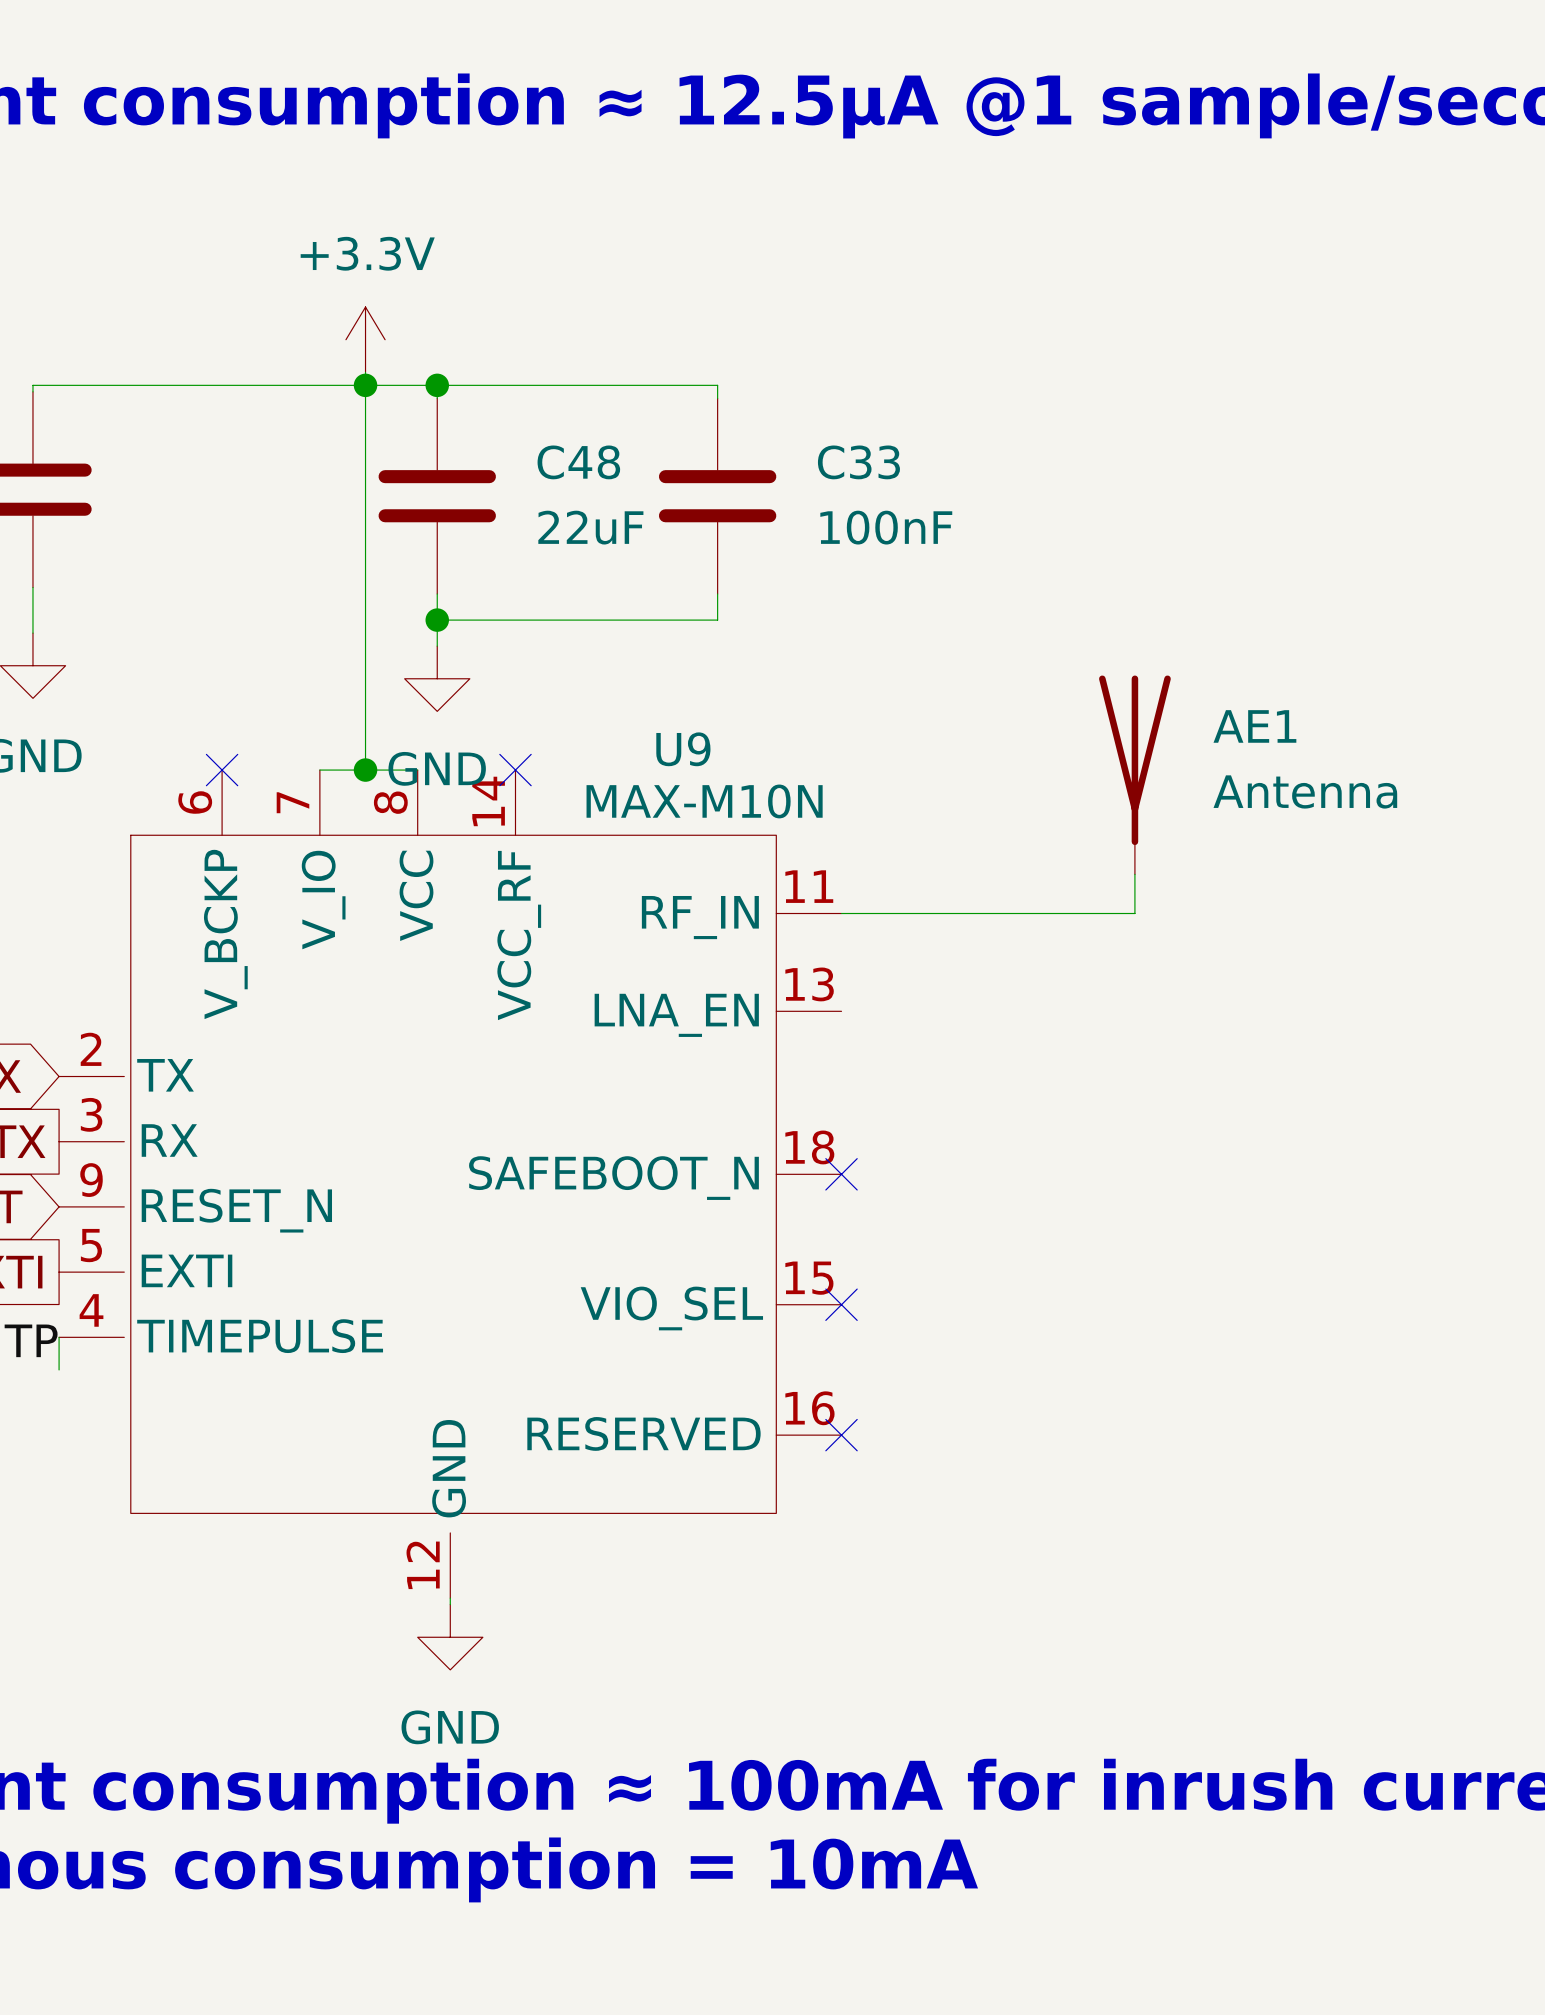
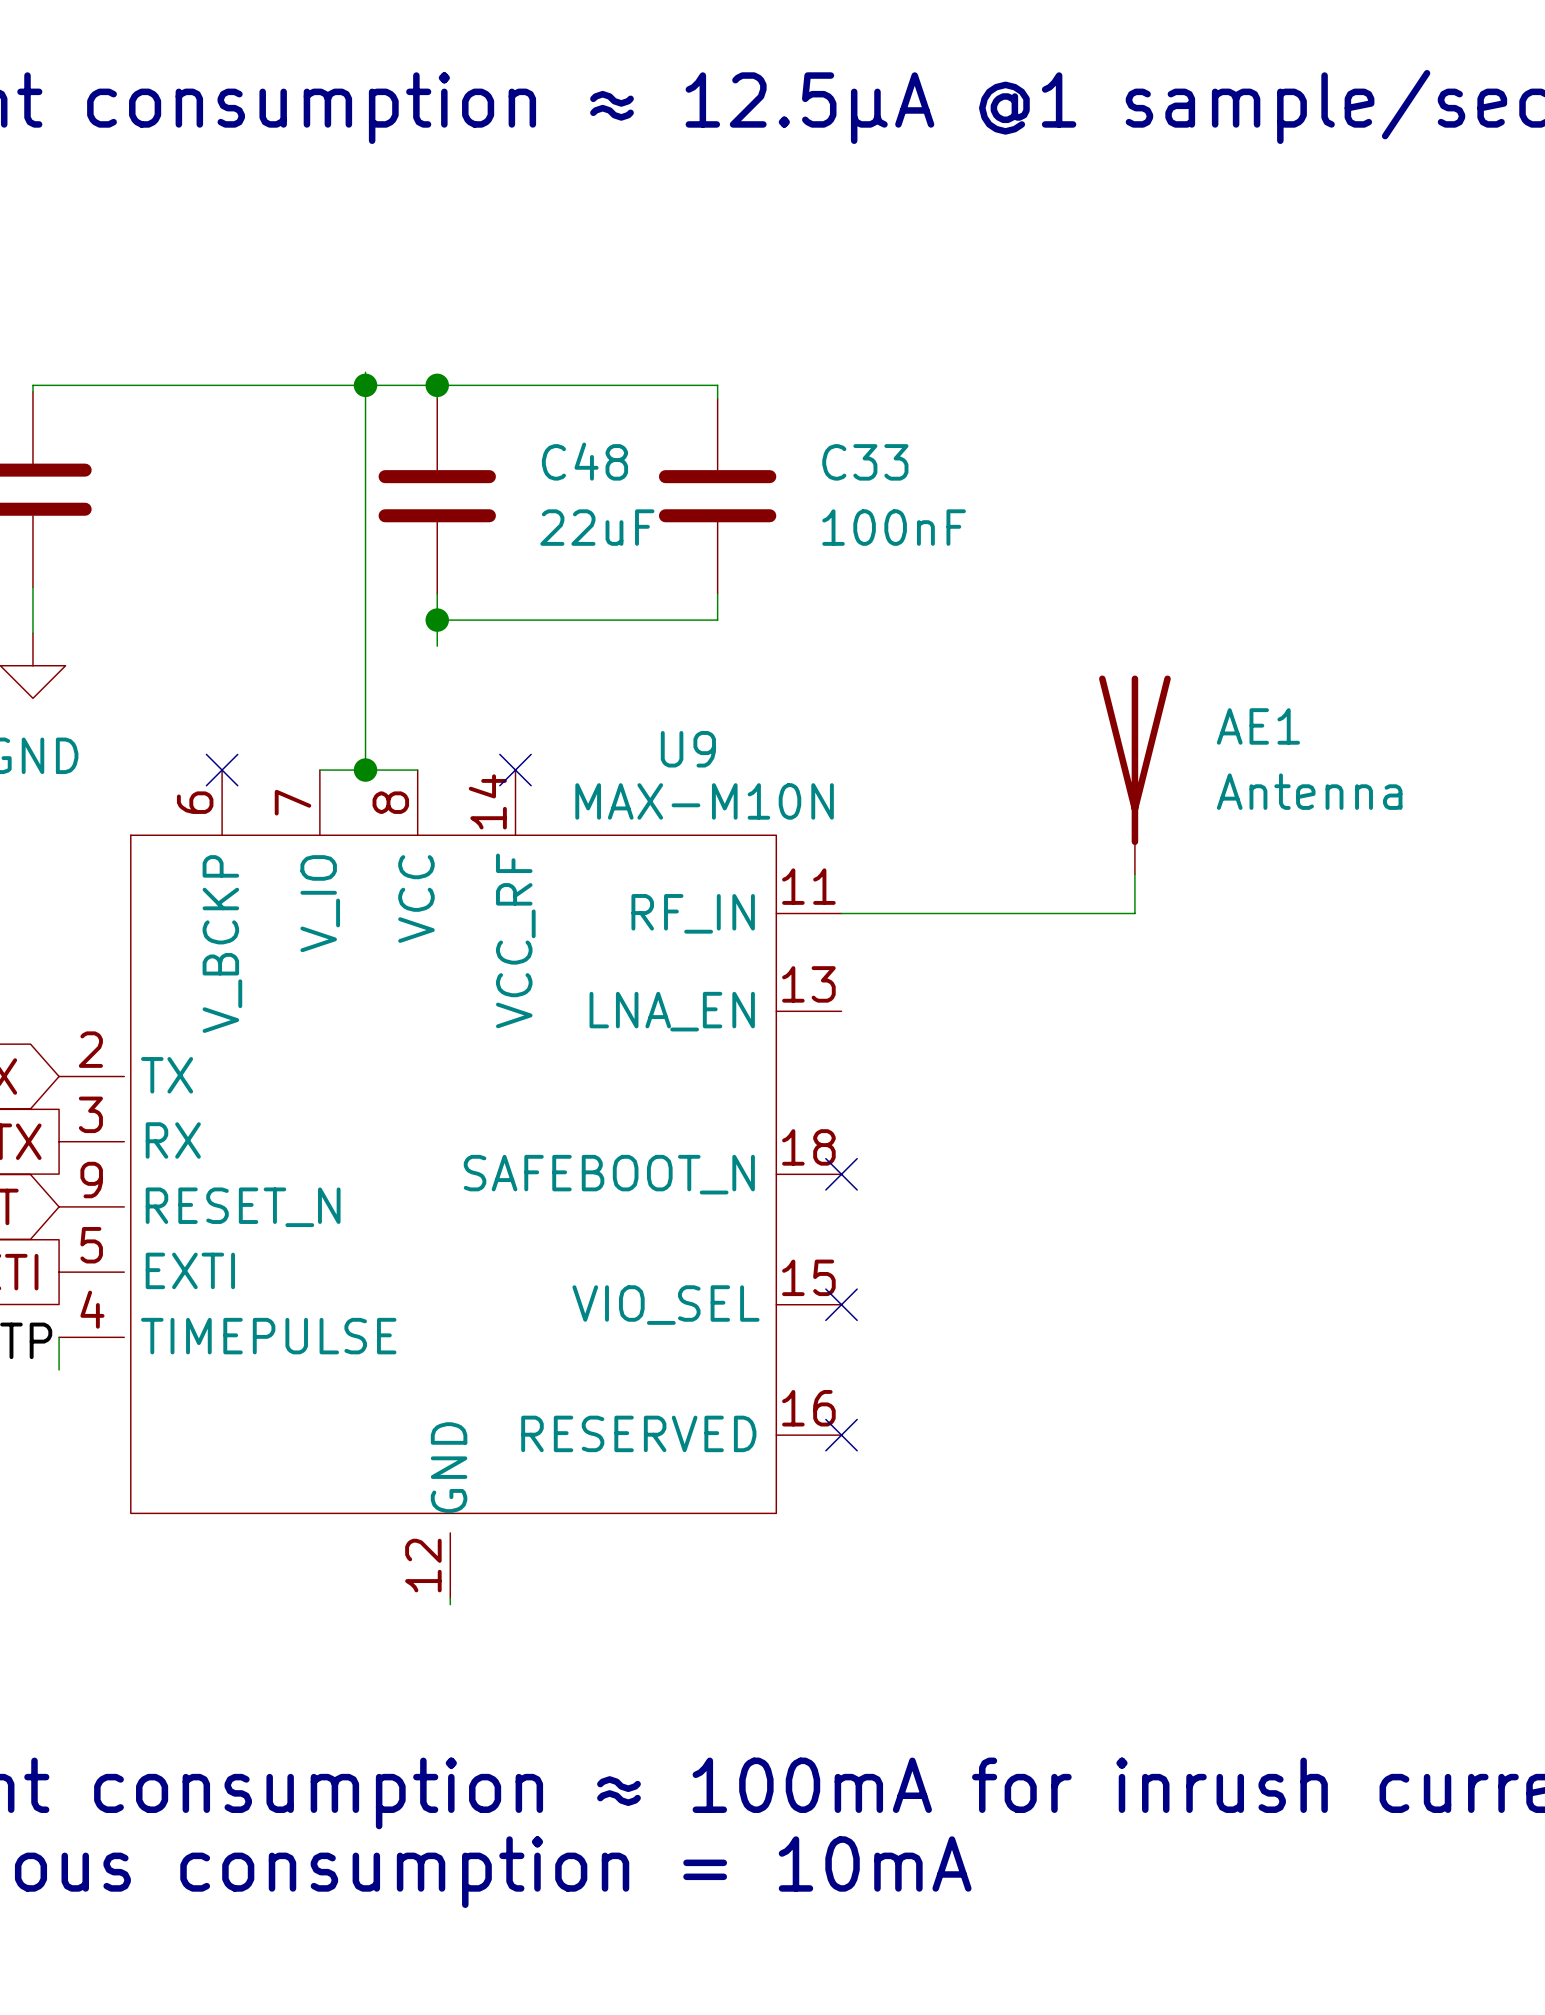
power symbol: +3.3V (365, 339) -> none
power symbol: GND (437, 678) -> none
power symbol: GND (450, 1637) -> none

